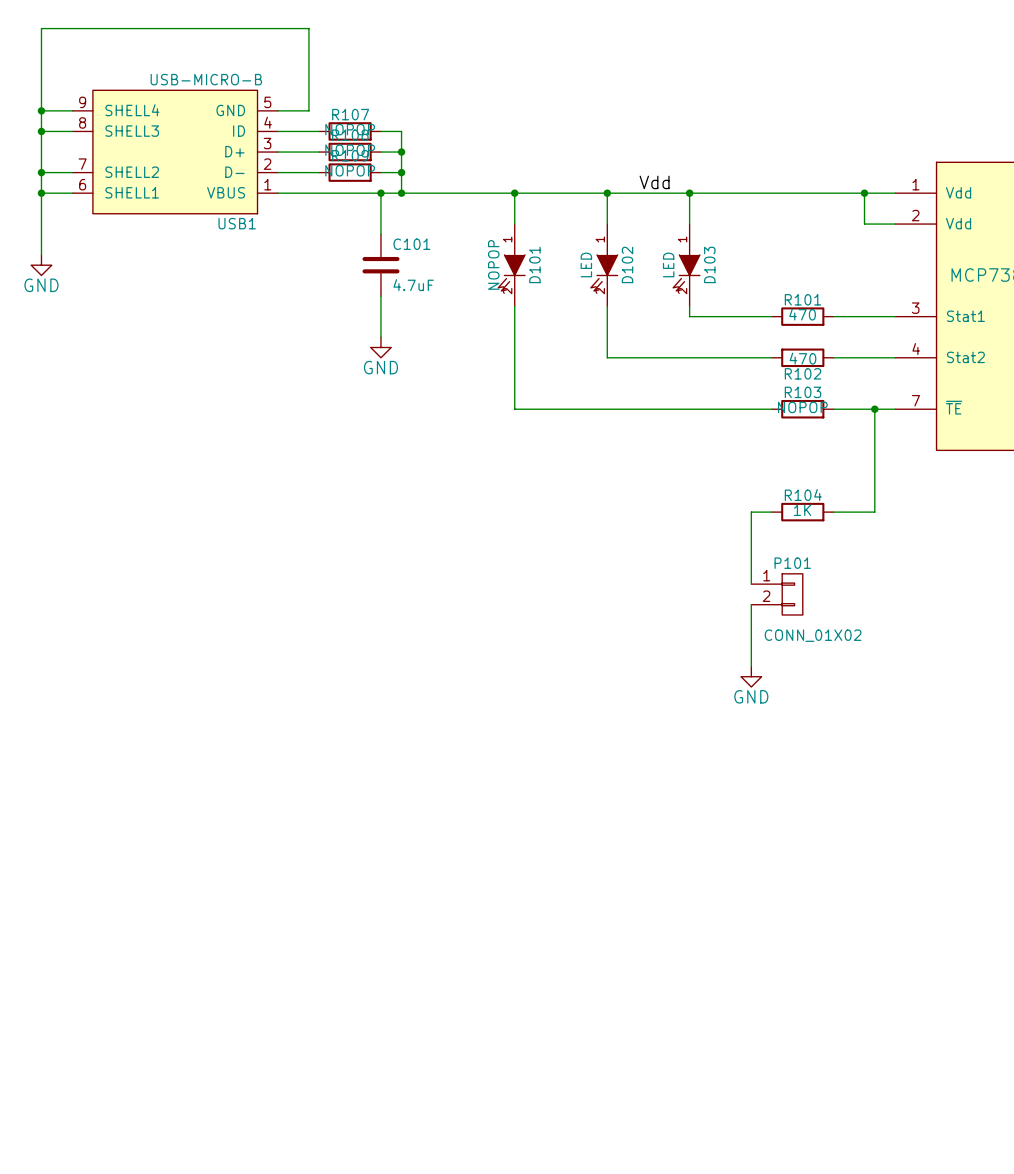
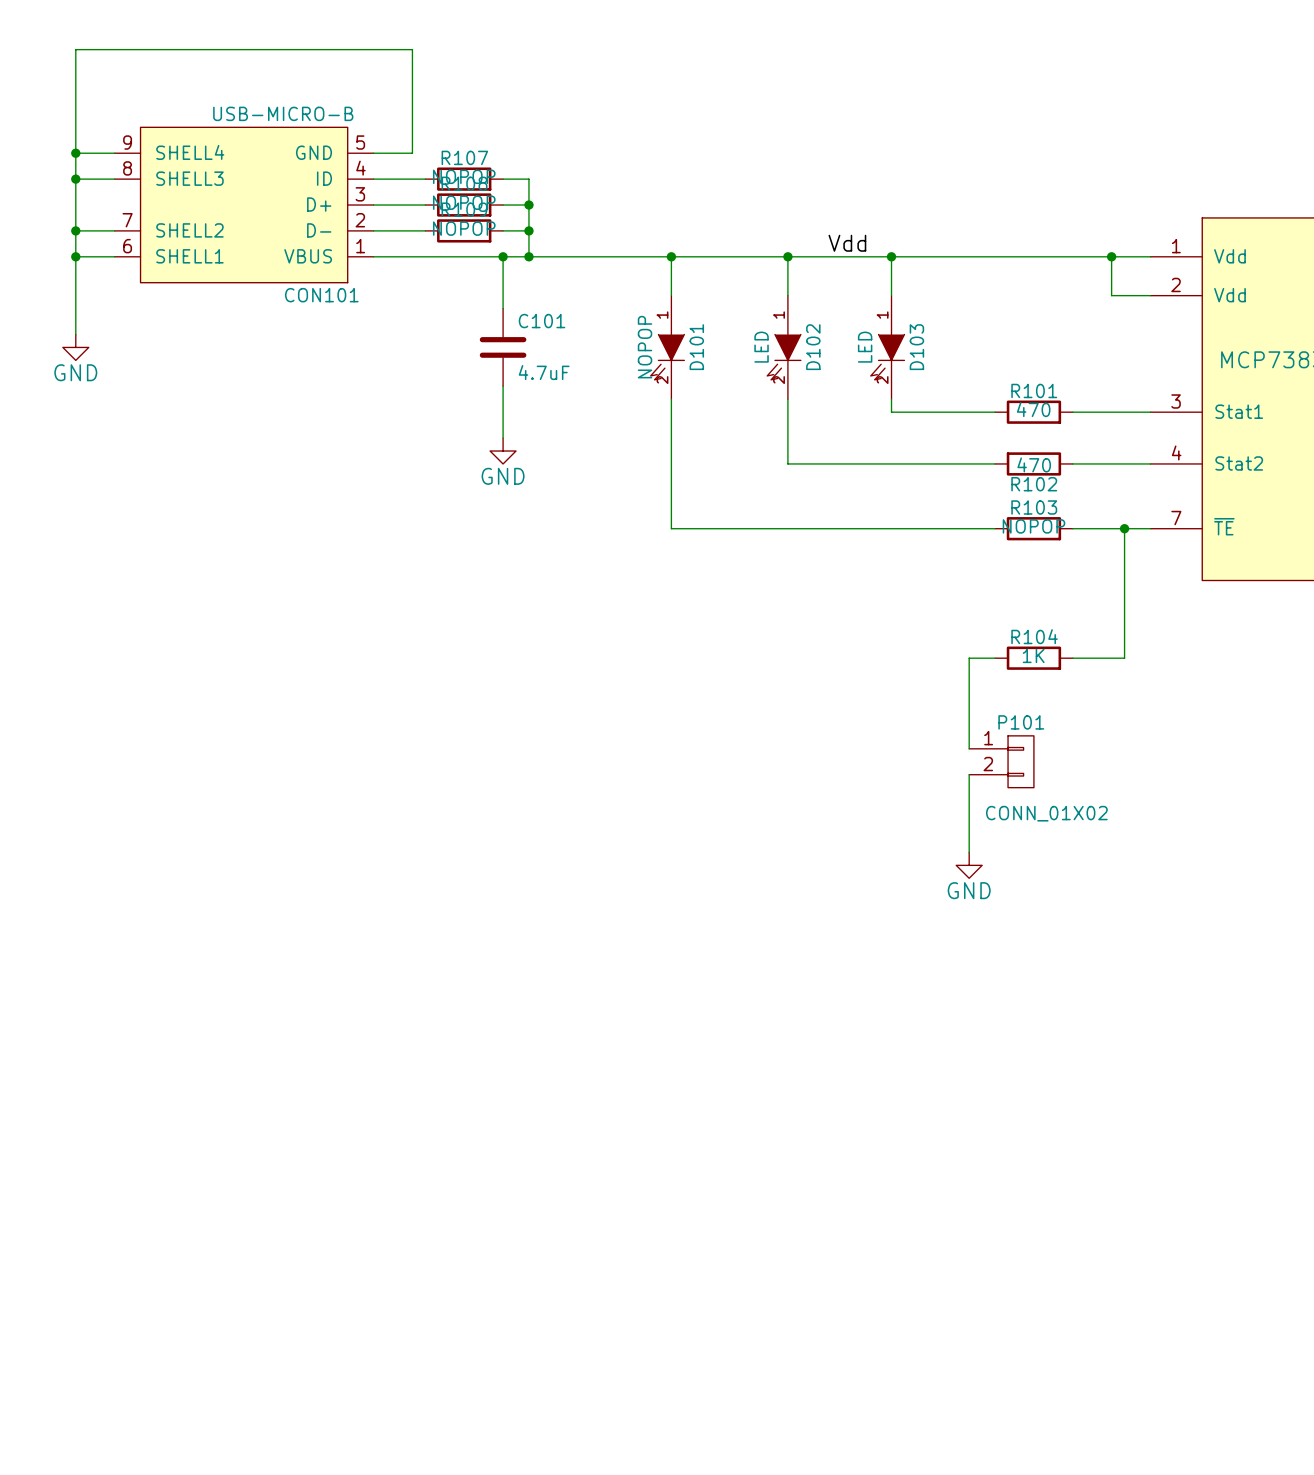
USB1 name: USB1 (237, 223) -> CON101 (321, 295)

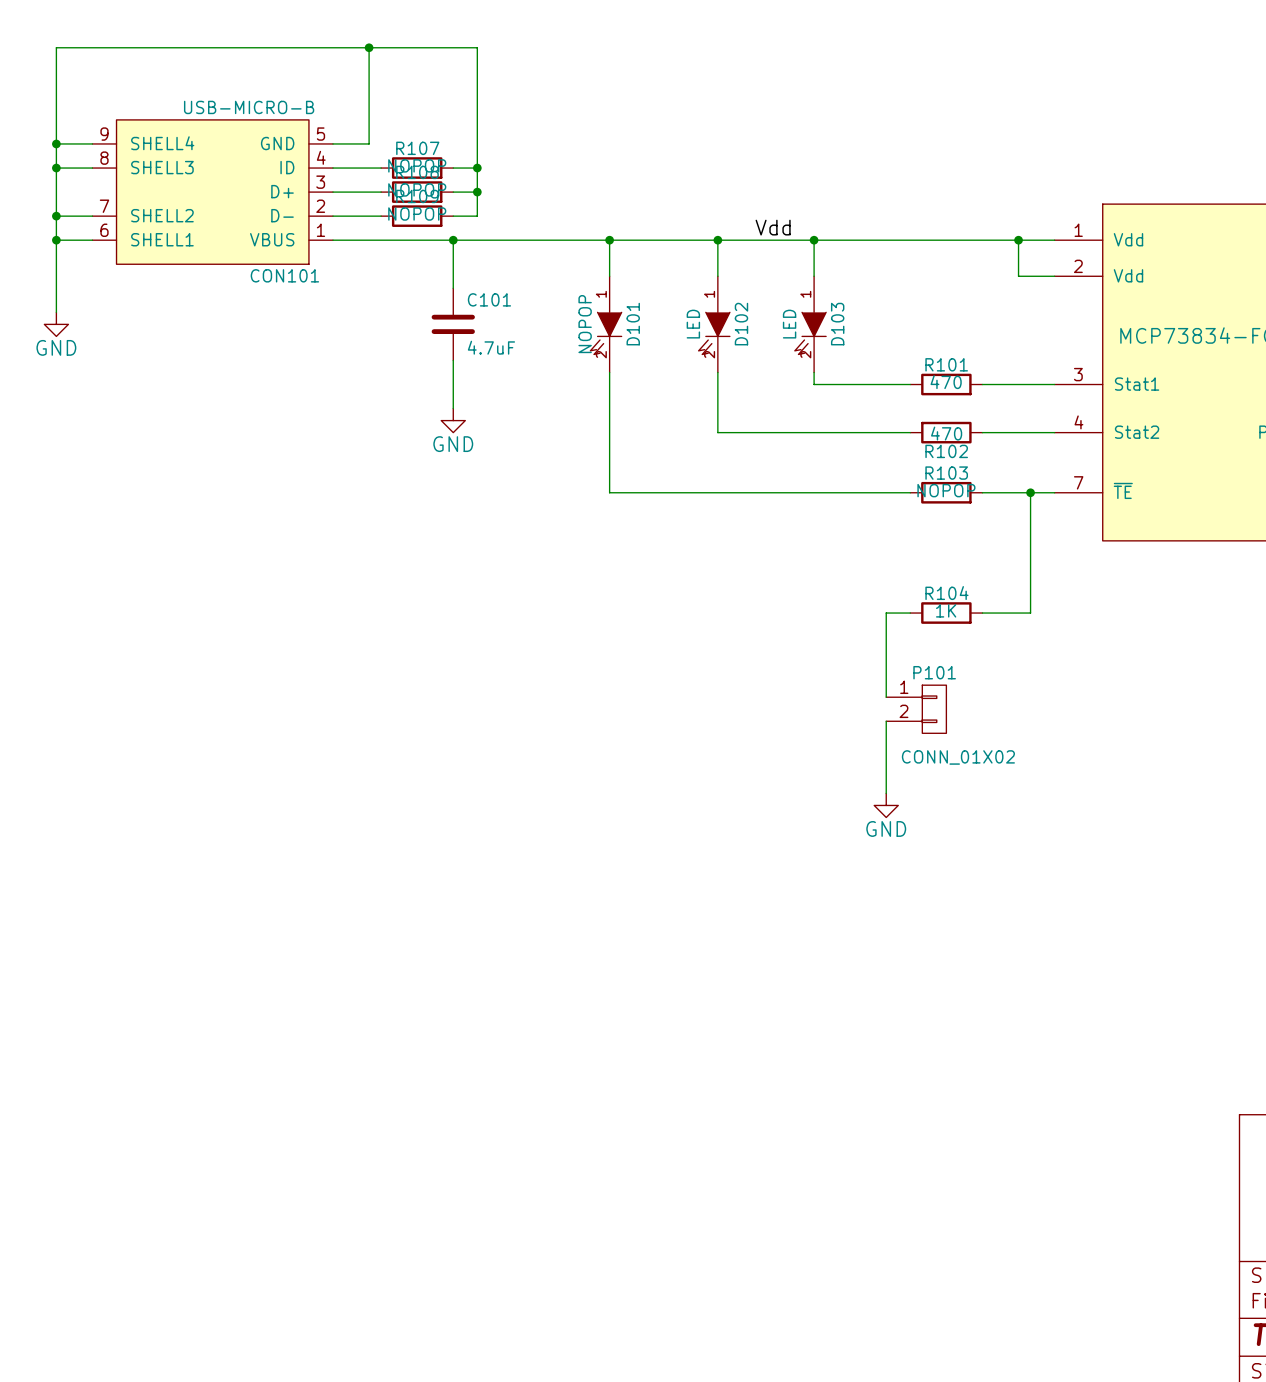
wire: none -> (369, 47) (477, 47) (477, 168)
junction: none -> (369, 47)
junction: none -> (477, 168)
wire: (528, 230) (528, 256) -> none
junction: (528, 230) -> none
junction: (528, 256) -> none

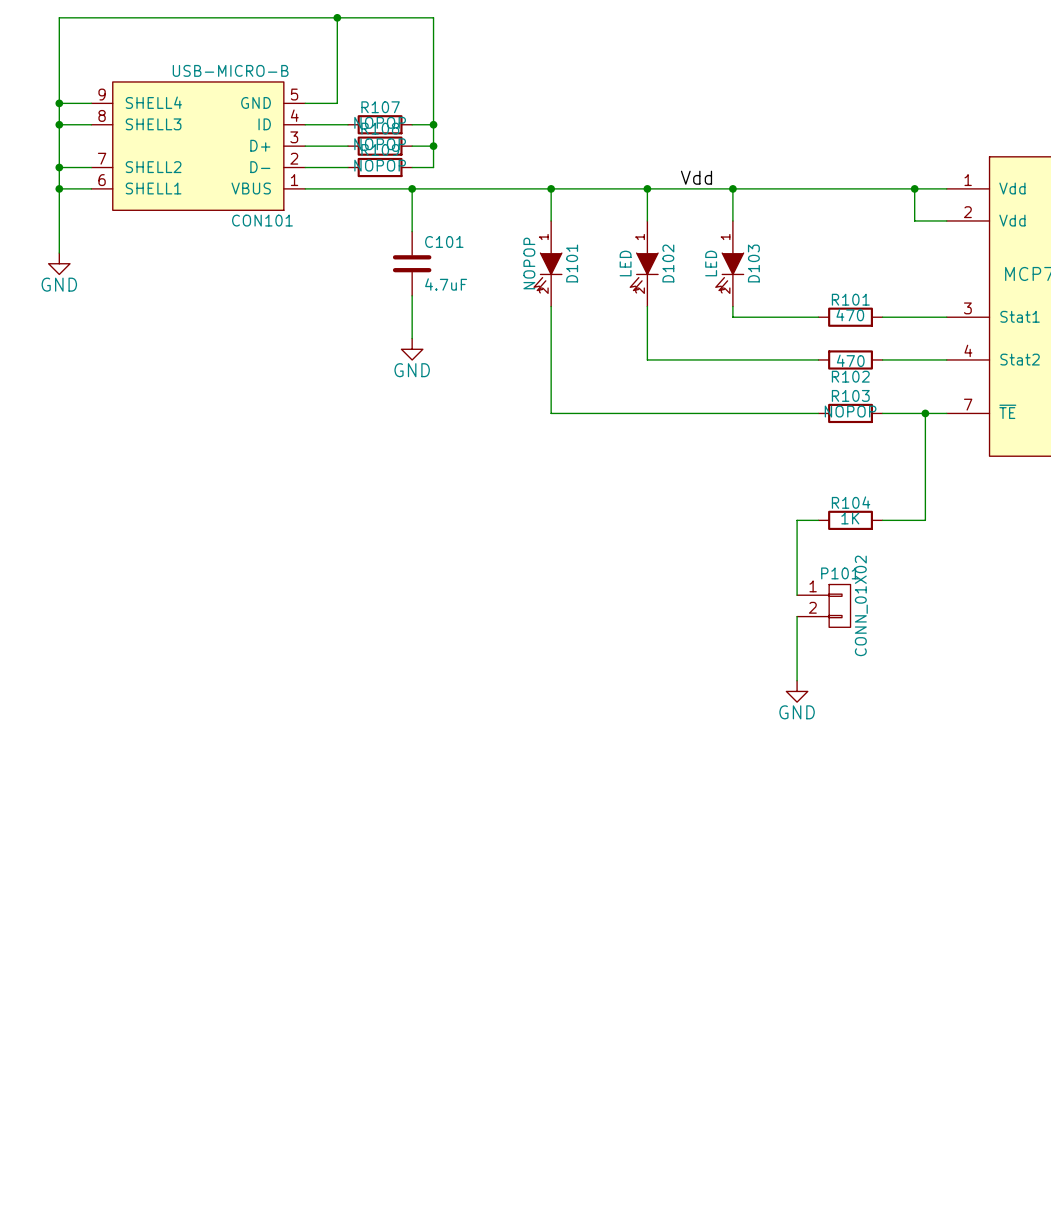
P101 value rotation: 0° (958, 757) -> 90° counterclockwise (861, 605)

